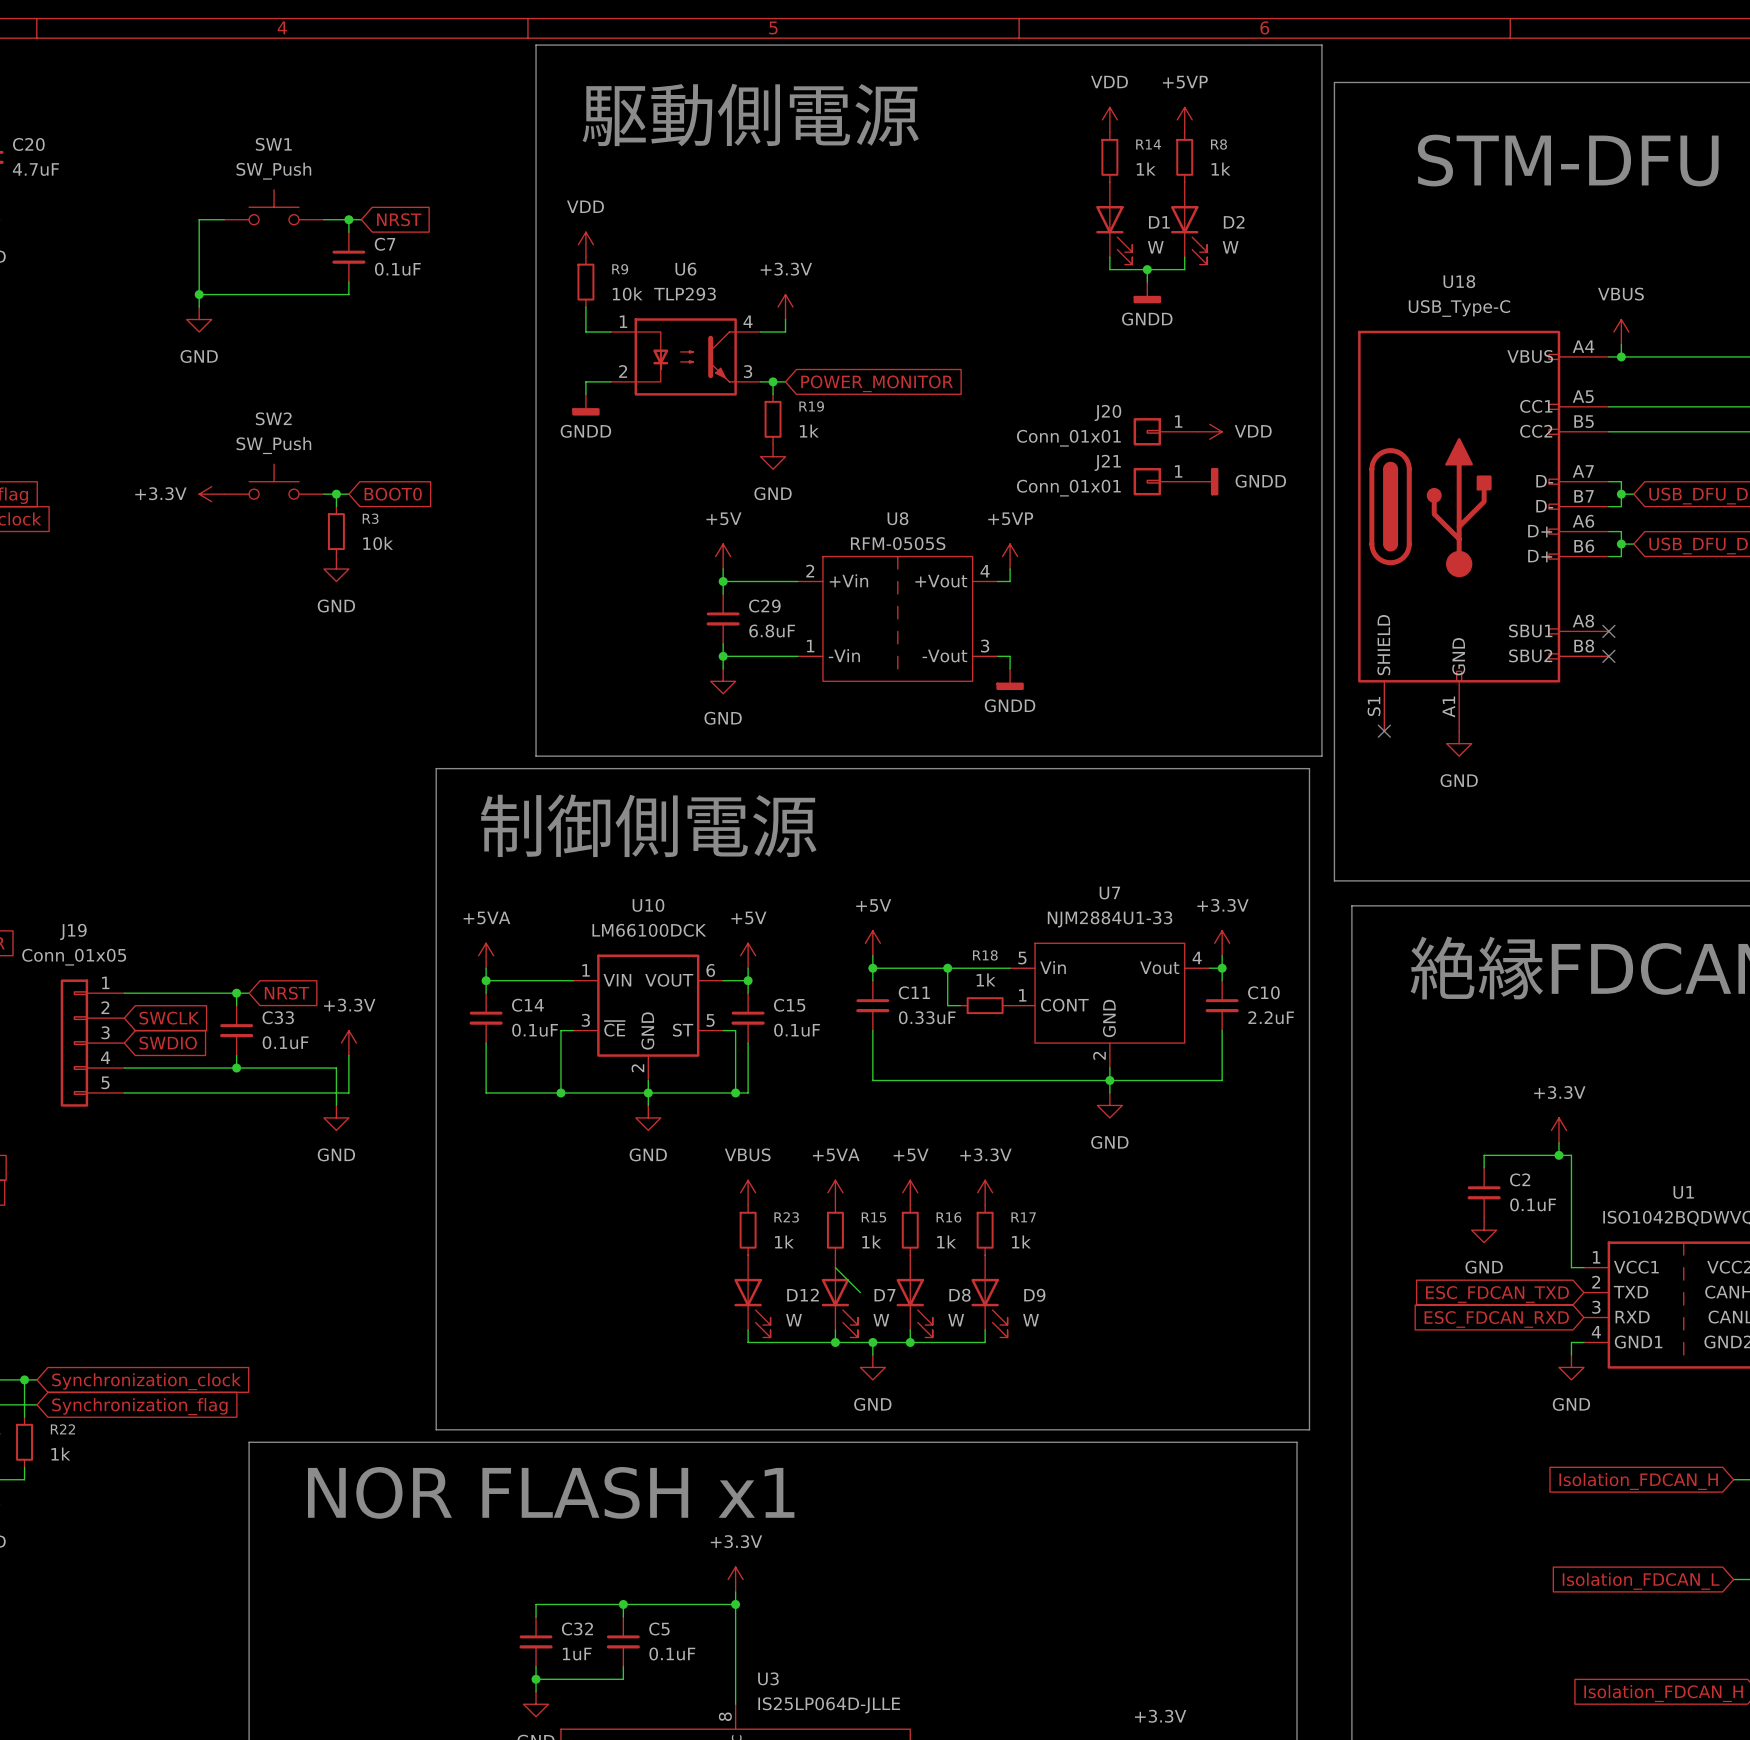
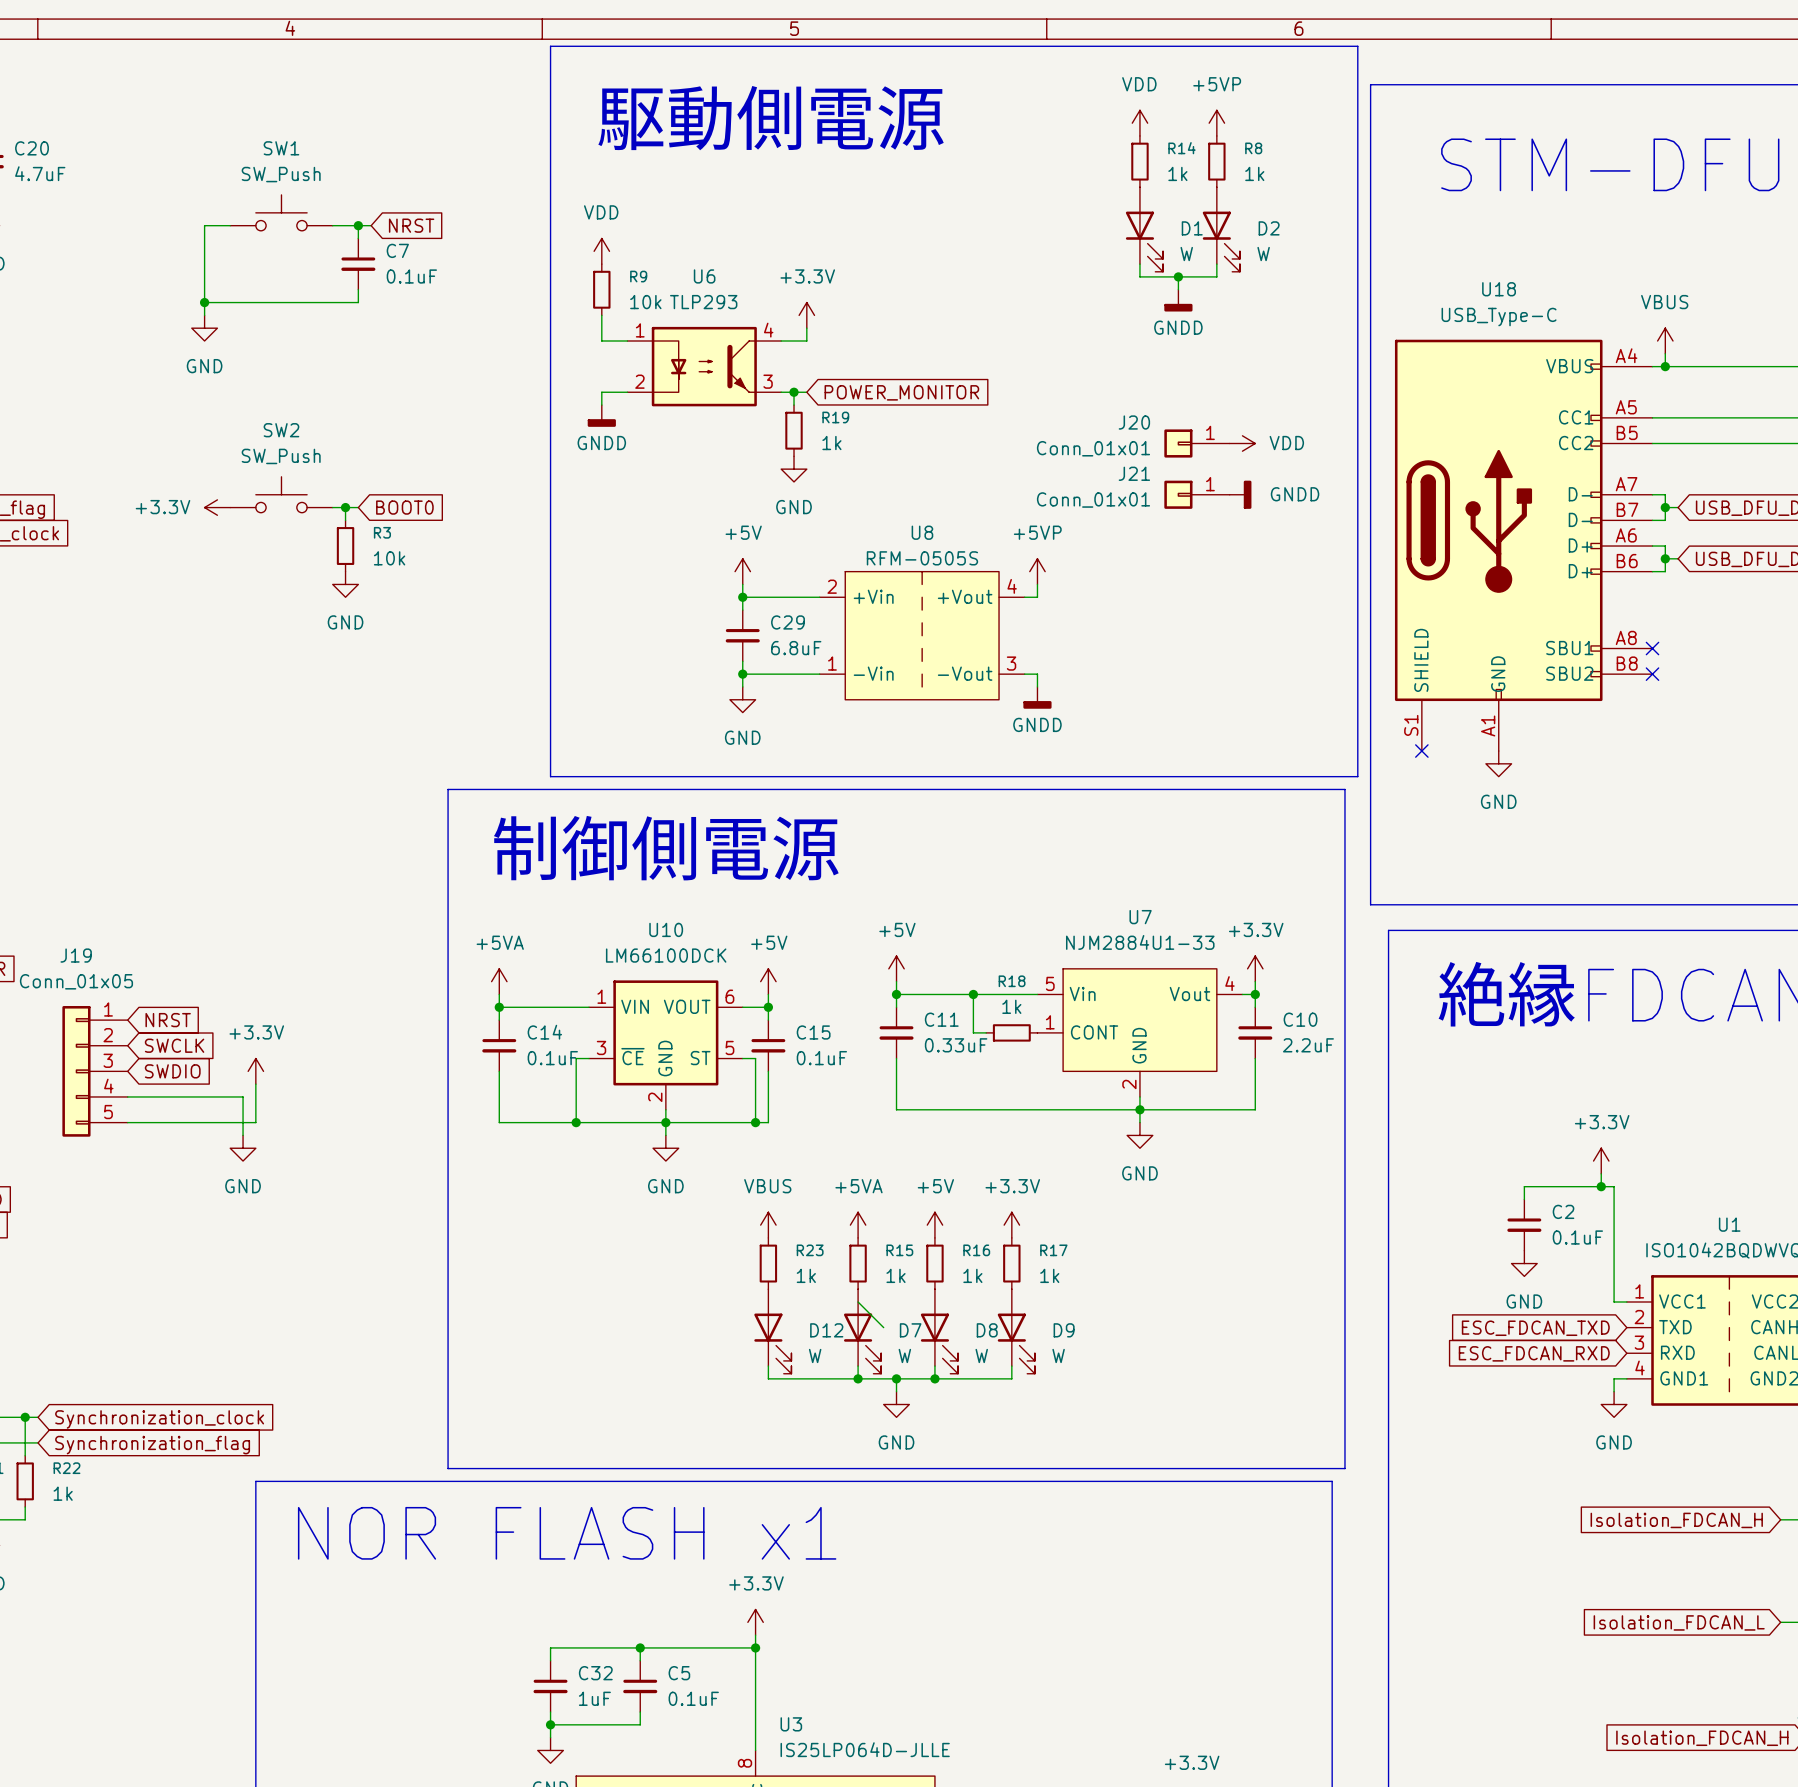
wire: (124, 993) (249, 993) -> none
wire: (236, 993) (236, 1005) -> none
junction: (236, 993) -> none
global label position: NRST (286, 993) -> NRST (168, 1020)
C33: 0.1uF (236, 1030) -> none
power symbol position: +3.3V (348, 1043) -> +3.3V (255, 1071)
wire: (236, 1055) (236, 1068) (336, 1068) (336, 1105) -> none
wire: (348, 1055) (348, 1092) (249, 1092) -> (255, 1084) (255, 1122)
wire: none -> (243, 1096) (243, 1135)
junction: (236, 1068) -> none
power symbol position: GND (336, 1117) -> GND (243, 1148)

